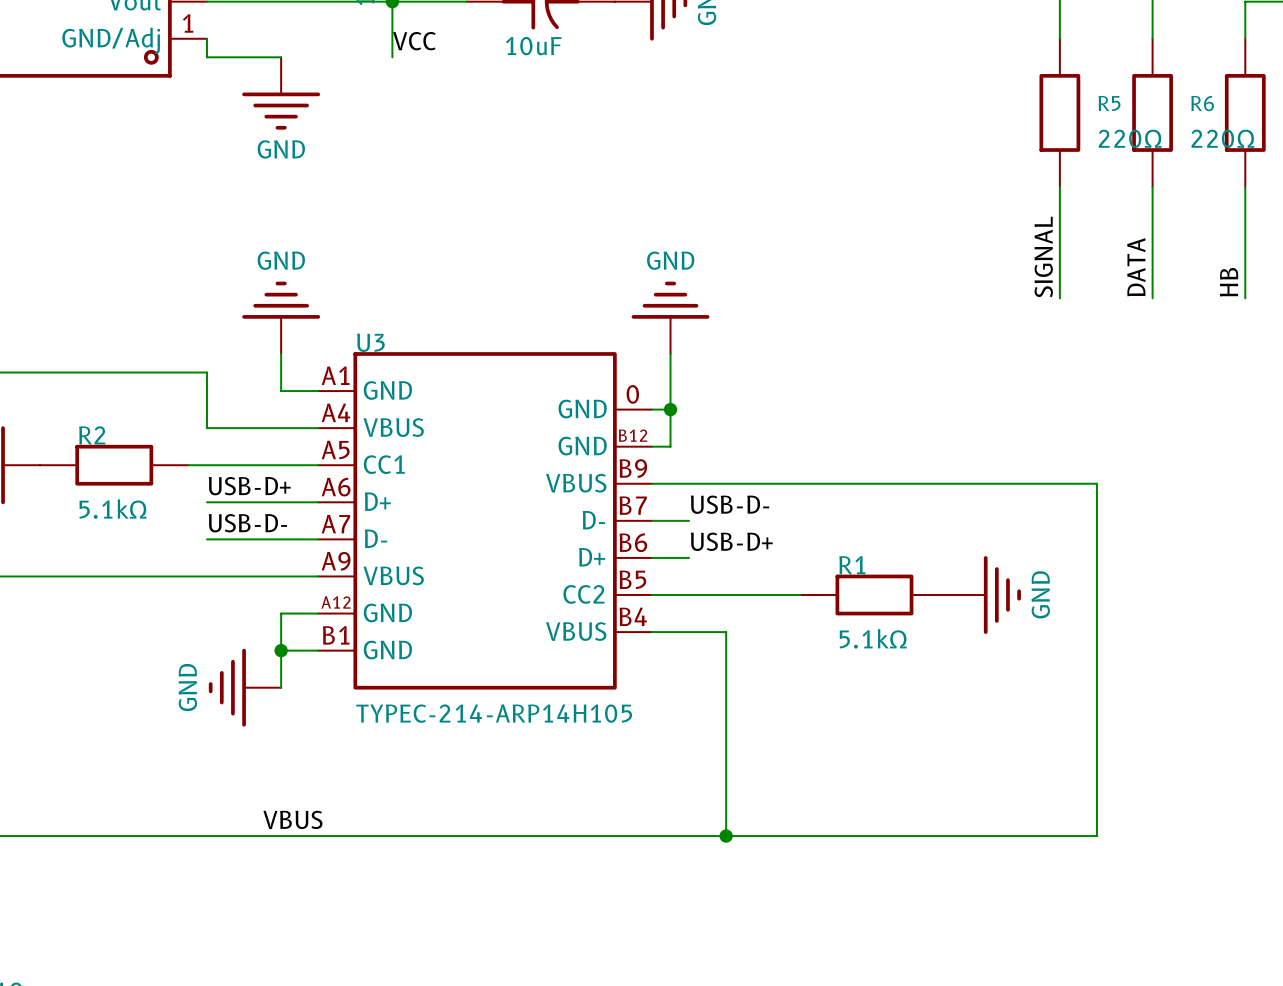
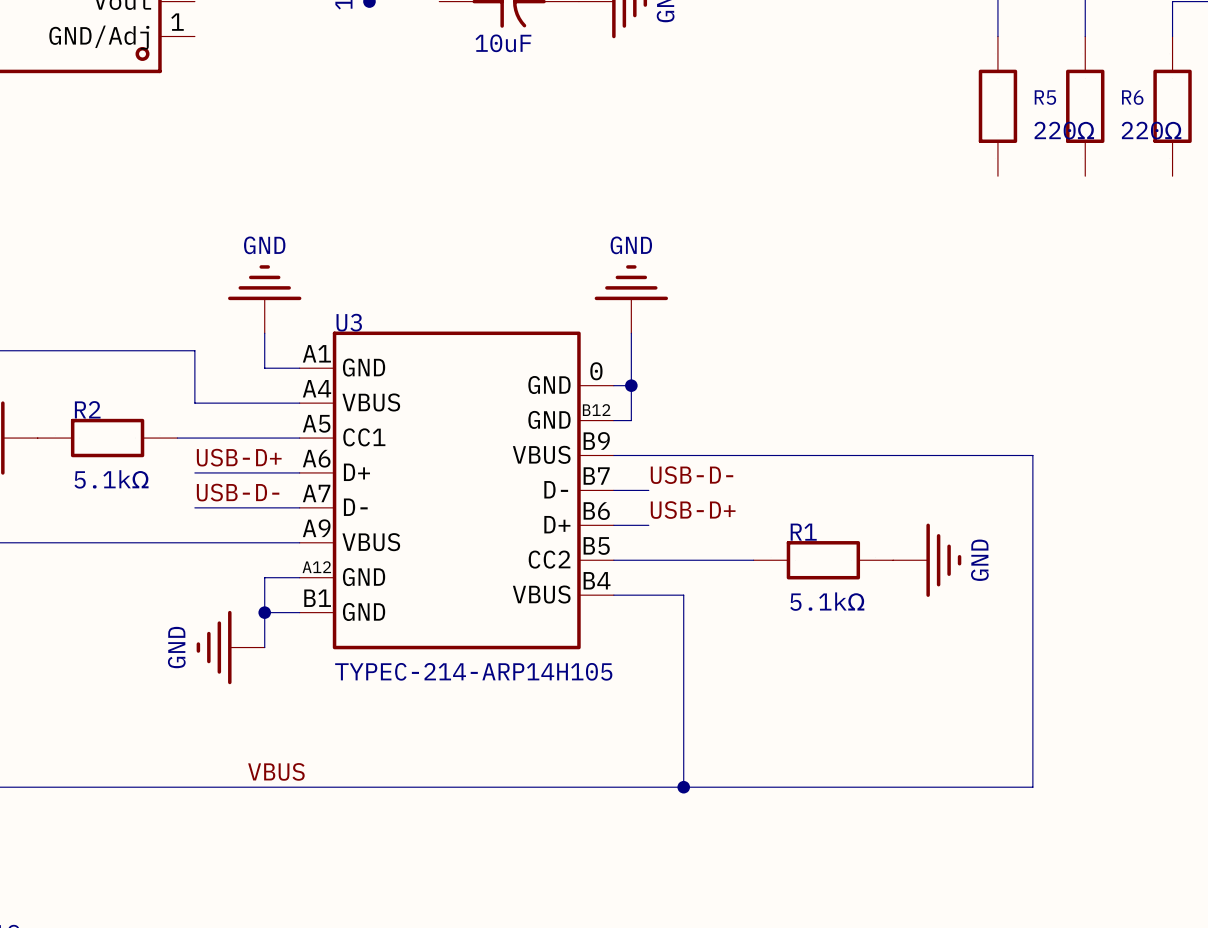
wire: (206, 1) (466, 1) -> none
wire: (392, 1) (392, 57) -> none
wire: (206, 38) (206, 57) (281, 57) -> none
label: VCC (414, 41) -> none
power symbol: GND (281, 93) -> none
wire: (1059, 187) (1059, 298) -> none
wire: (1152, 187) (1152, 298) -> none
wire: (1245, 187) (1245, 298) -> none
label: SIGNAL (1043, 256) -> none
label: DATA (1136, 267) -> none
label: HB (1229, 282) -> none

